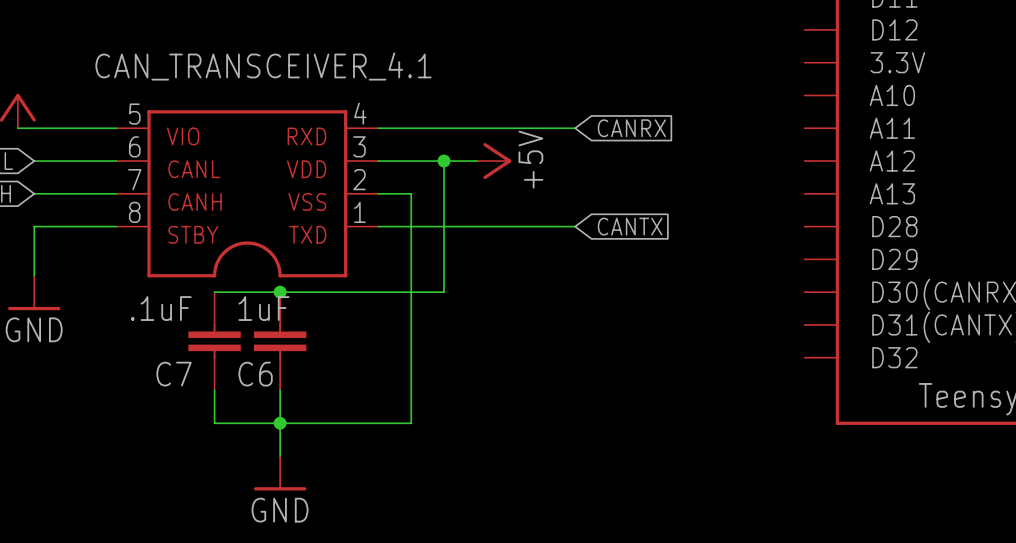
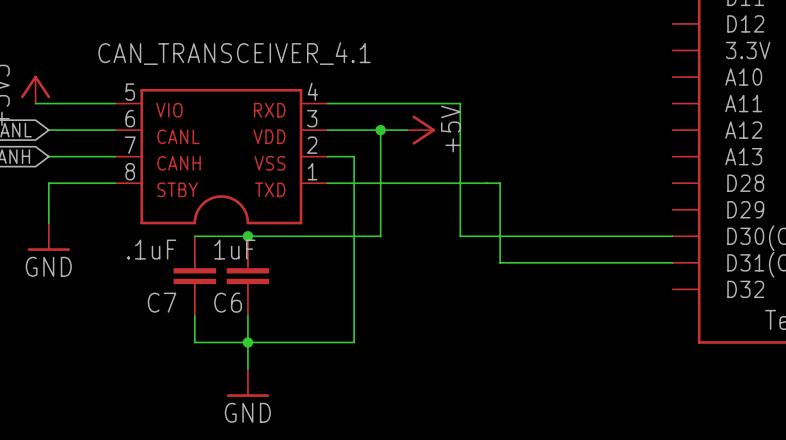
wire: (542, 128) (575, 128) -> (460, 103) (460, 236) (672, 236)
global label: CANRX (631, 128) -> none
wire: none -> (486, 183) (500, 183) (500, 262) (672, 262)
global label: CANTX (630, 226) -> none

